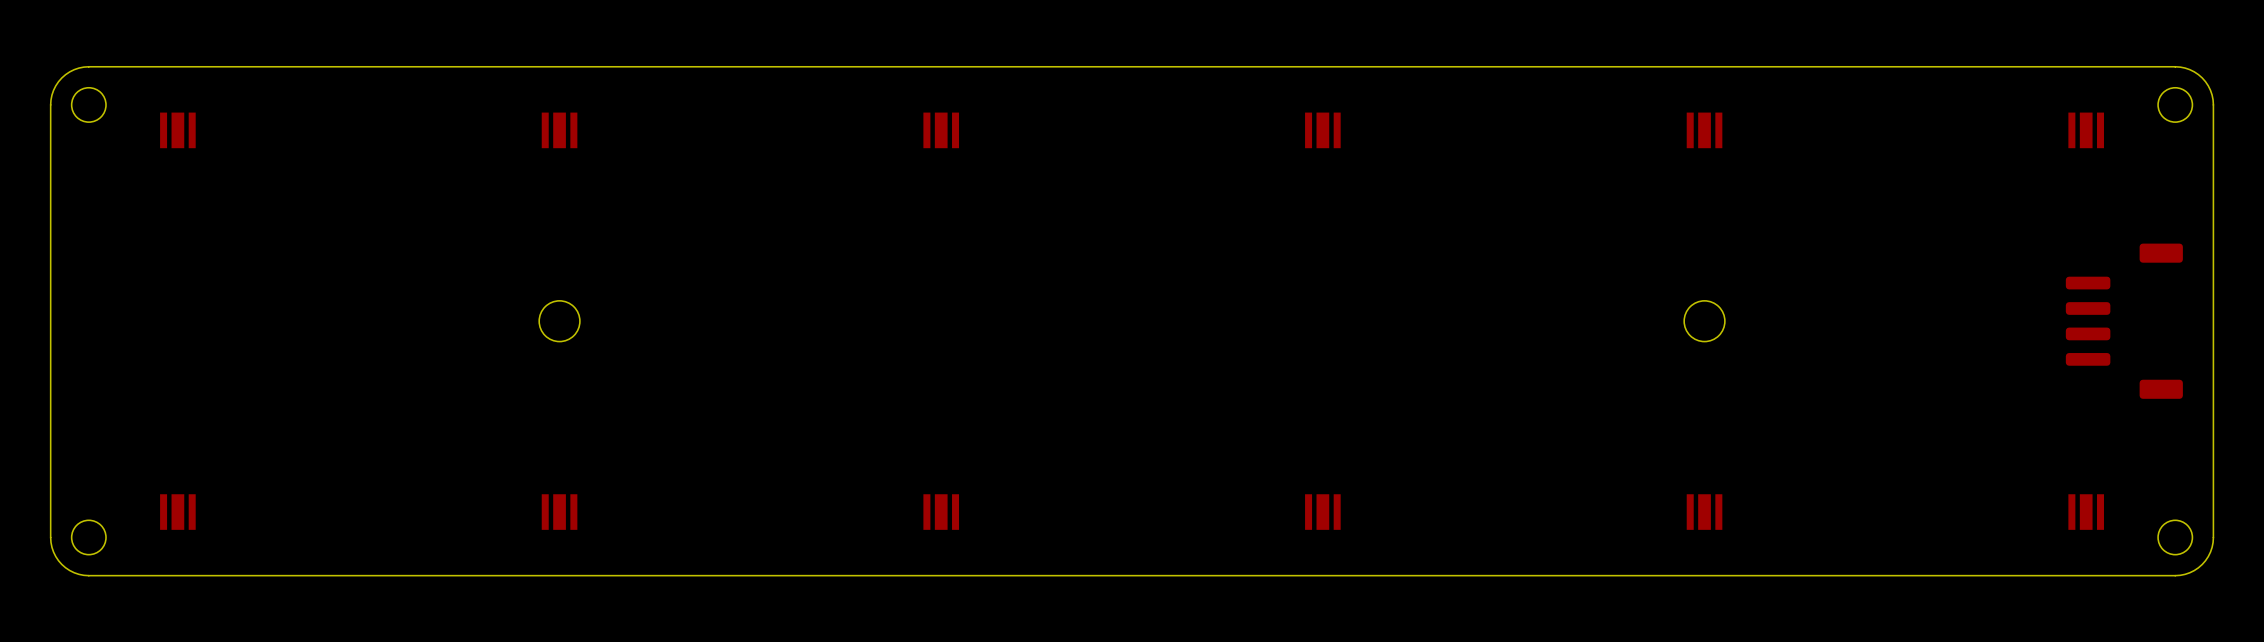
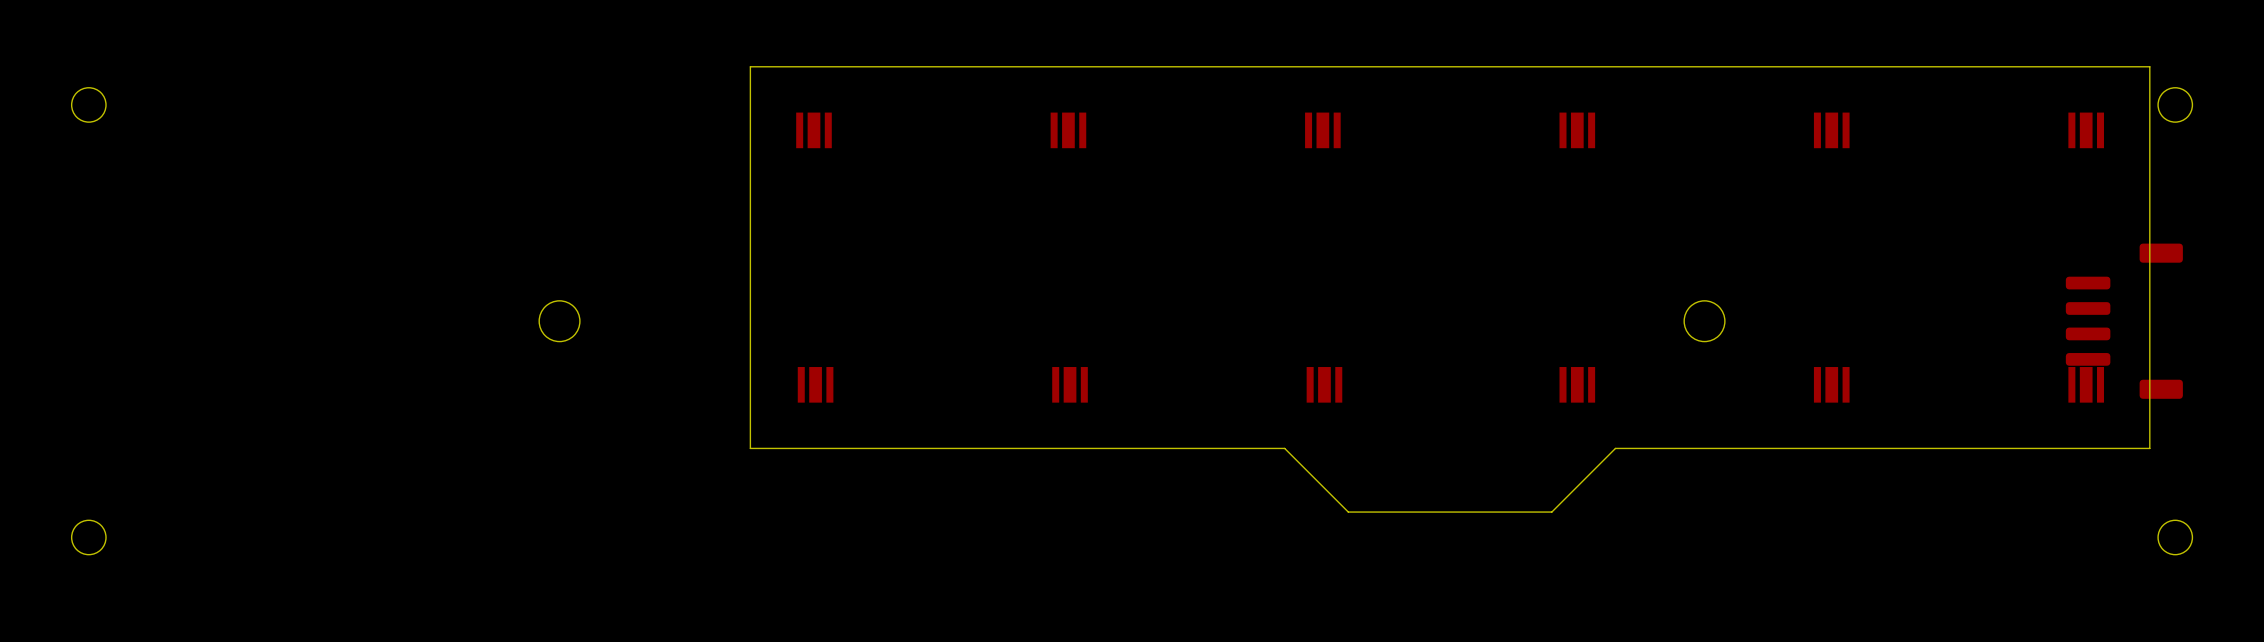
board edge: (2149, 66) (2180, 67) (2194, 71) (2208, 85) (2213, 99) (2213, 537) (2212, 547) (2205, 560) (2194, 570) (2185, 574) (88, 575) (74, 572) (58, 560) (51, 547) (50, 537) (50, 104) (55, 85) (65, 74) (74, 69) (88, 66) (750, 66) -> (2149, 66) (2149, 448) (1615, 448) (1551, 512) (1348, 512) (1284, 448) (750, 448) (750, 66)
part: (177, 130) -> none
part: (559, 130) -> none
part: none -> (813, 130)
part: (941, 130) -> none
part: none -> (1068, 130)
part: none -> (1577, 130)
part: (1704, 130) -> none
part: none -> (1831, 130)
part: none -> (815, 384)
part: none -> (1070, 384)
part: none -> (1577, 384)
part: none -> (1831, 384)
part: (177, 512) -> none
part: (559, 512) -> none
part: (941, 512) -> none
part position: (1322, 512) -> (1324, 384)
part: (1704, 512) -> none
part position: (2086, 512) -> (2086, 384)

